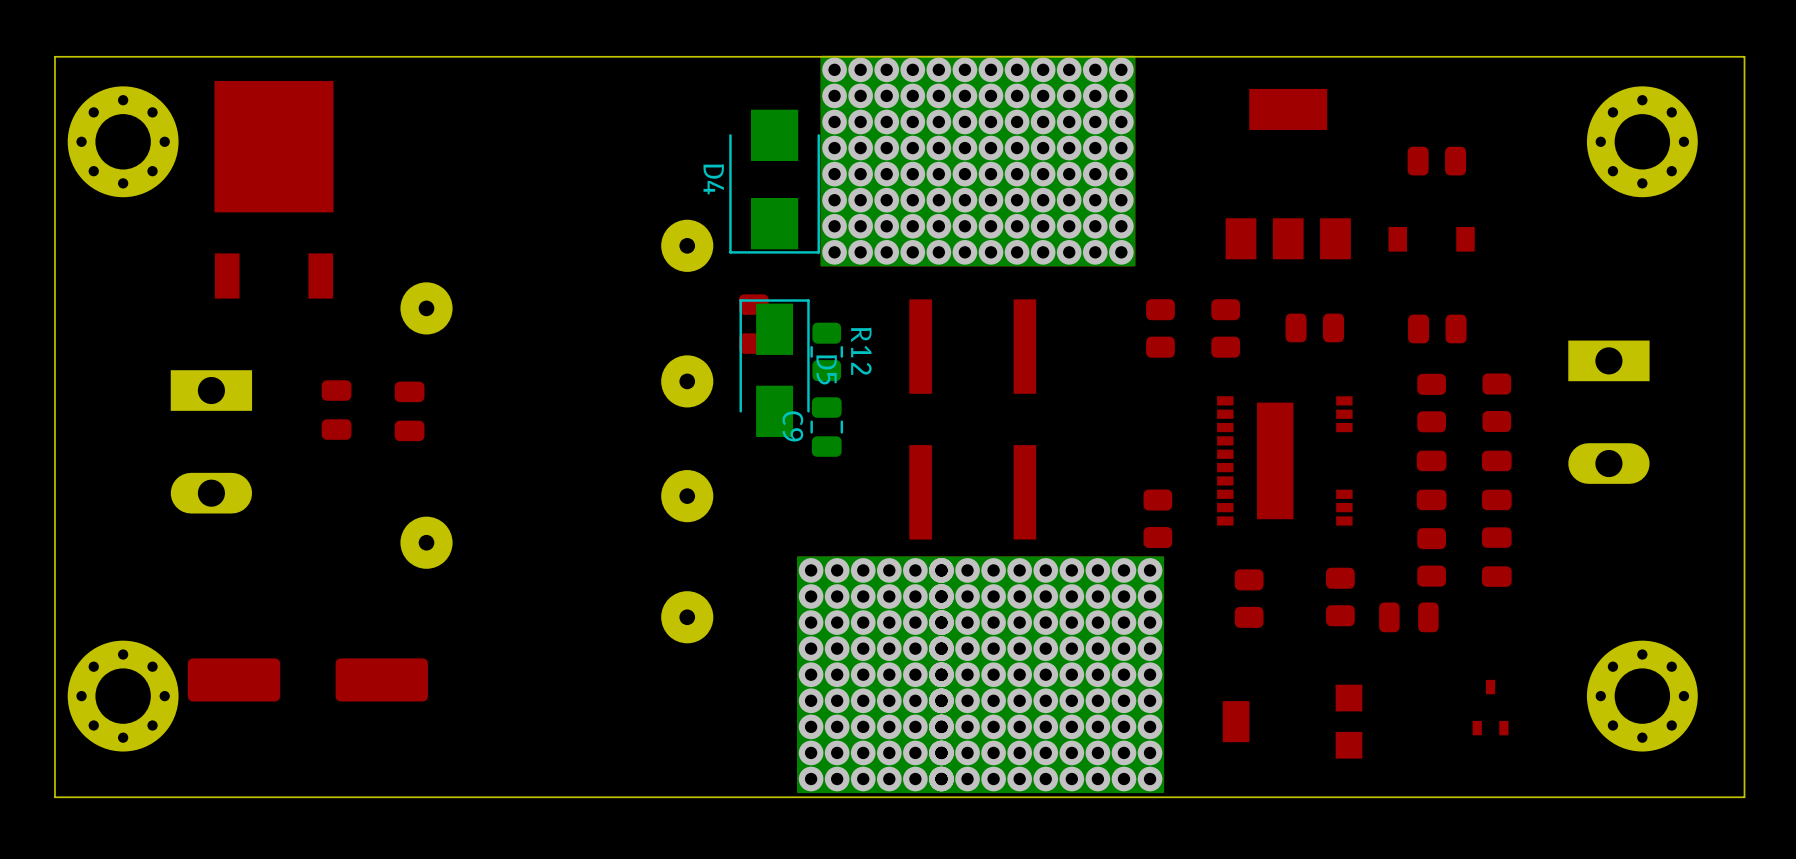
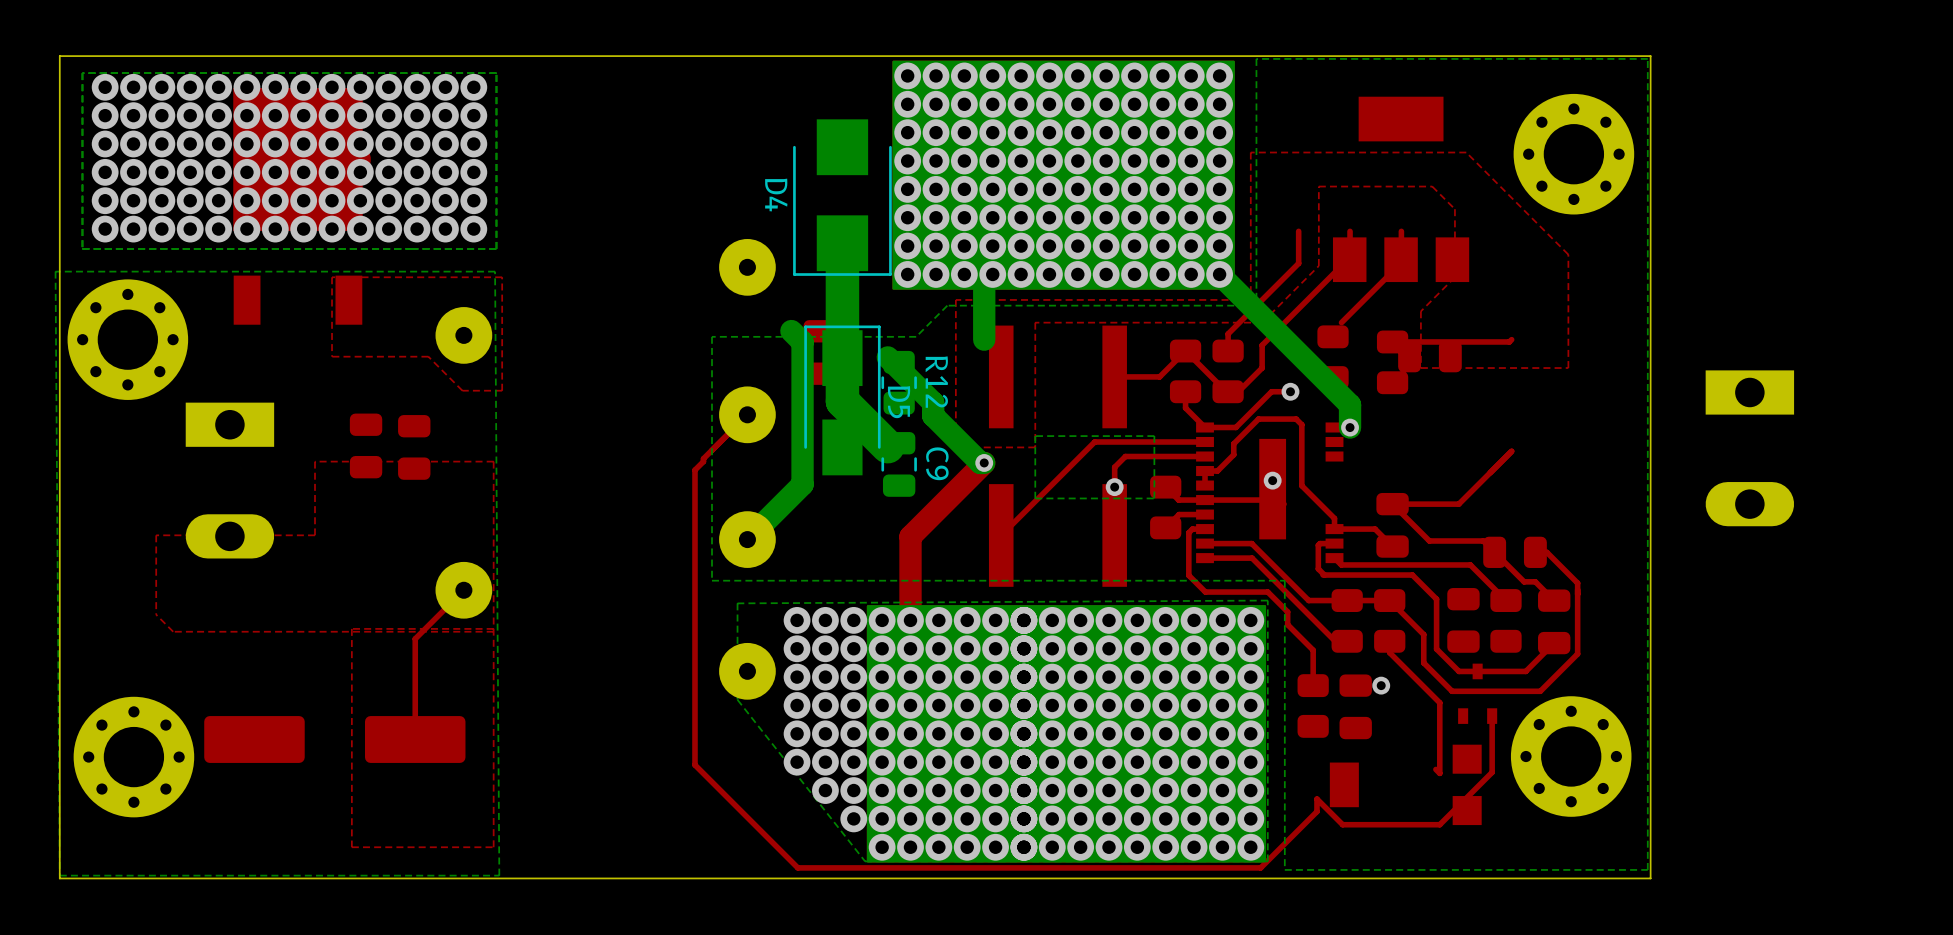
bottom zone outline: none -> (1647, 58) (1647, 869) (1284, 869) (1284, 580) (712, 580) (712, 336) (916, 336) (947, 305) (1256, 305) (1256, 58) (1647, 58)
board edge: (54, 56) (1744, 56) (1744, 797) (54, 797) -> (59, 61) (59, 56) (1650, 56) (1650, 878) (59, 878) (59, 867)
bottom zone outline: none -> (496, 73) (496, 248) (82, 248) (82, 73) (496, 73)
via: none -> (105, 87)
via: none -> (133, 87)
via: none -> (161, 87)
via: none -> (190, 87)
via: none -> (218, 87)
via: none -> (246, 87)
via: none -> (275, 87)
via: none -> (303, 87)
via: none -> (332, 87)
via: none -> (360, 87)
via: none -> (388, 87)
via: none -> (417, 87)
via: none -> (445, 87)
via: none -> (473, 87)
via: none -> (105, 115)
via: none -> (133, 115)
via: none -> (161, 115)
via: none -> (190, 115)
via: none -> (218, 115)
via: none -> (246, 115)
via: none -> (275, 115)
via: none -> (303, 115)
via: none -> (332, 115)
via: none -> (360, 115)
via: none -> (388, 115)
via: none -> (417, 115)
via: none -> (445, 115)
via: none -> (473, 115)
via: none -> (105, 144)
via: none -> (133, 144)
via: none -> (161, 144)
via: none -> (190, 144)
via: none -> (218, 144)
via: none -> (246, 144)
via: none -> (275, 144)
via: none -> (303, 144)
via: none -> (332, 144)
via: none -> (360, 144)
via: none -> (388, 144)
via: none -> (417, 144)
via: none -> (445, 144)
via: none -> (473, 144)
top zone outline: none -> (1466, 152) (1568, 254) (1568, 368) (1420, 368) (1420, 311) (1454, 277) (1454, 209) (1432, 186) (1318, 186) (1318, 265) (1262, 322) (1035, 322) (1035, 447) (955, 447) (955, 299) (1250, 299) (1250, 152) (1466, 152)
part position: (123, 141) -> (127, 339)
part position: (1642, 141) -> (1573, 154)
via: none -> (105, 172)
via: none -> (133, 172)
via: none -> (161, 172)
via: none -> (190, 172)
via: none -> (218, 172)
via: none -> (246, 172)
via: none -> (275, 172)
via: none -> (303, 172)
via: none -> (332, 172)
via: none -> (360, 172)
via: none -> (388, 172)
via: none -> (417, 172)
via: none -> (445, 172)
via: none -> (473, 172)
part: (1436, 161) -> none
via: none -> (105, 200)
via: none -> (133, 200)
via: none -> (161, 200)
via: none -> (190, 200)
via: none -> (218, 200)
via: none -> (246, 200)
via: none -> (275, 200)
via: none -> (303, 200)
via: none -> (332, 200)
via: none -> (360, 200)
via: none -> (388, 200)
via: none -> (417, 200)
via: none -> (445, 200)
via: none -> (473, 200)
via: none -> (105, 229)
via: none -> (133, 229)
via: none -> (161, 229)
via: none -> (190, 229)
via: none -> (218, 229)
via: none -> (246, 229)
via: none -> (275, 229)
via: none -> (303, 229)
via: none -> (332, 229)
via: none -> (360, 229)
via: none -> (388, 229)
via: none -> (417, 229)
via: none -> (445, 229)
via: none -> (473, 229)
top track: none -> (1298, 231) (1298, 263) (1228, 333) (1228, 351)
top track: none -> (1350, 231) (1350, 257) (1262, 345) (1262, 368) (1238, 391) (1226, 391) (1185, 351) (1159, 376) (1114, 376)
top track: none -> (1401, 231) (1401, 262) (1341, 322)
bottom track: none -> (842, 243) (842, 401) (887, 446)
part: (1431, 239) -> none
bottom zone outline: none -> (495, 271) (499, 875) (59, 875) (55, 271) (495, 271)
bottom track: none -> (992, 274) (984, 282) (984, 339)
bottom track: none -> (1219, 274) (1350, 404) (1350, 427)
top zone outline: none -> (502, 277) (502, 390) (462, 390) (428, 356) (332, 356) (332, 277) (502, 277)
bottom track: none -> (791, 331) (802, 342) (802, 484) (747, 539)
top track: none -> (1511, 339) (1509, 341) (1392, 341)
bottom track: none -> (887, 357) (933, 402) (933, 415) (980, 462) (984, 462)
part position: (1160, 328) -> (1228, 371)
part: (1437, 328) -> none
part: none -> (1392, 362)
part: none -> (1185, 371)
top track: none -> (1290, 391) (1271, 391) (1235, 427) (1205, 427) (1185, 408) (1185, 391)
via: none -> (1290, 391)
top track: none -> (747, 414) (703, 458) (703, 461) (694, 470) (694, 765) (797, 867) (1260, 867) (1316, 811) (1316, 799) (1342, 824) (1439, 824) (1492, 772) (1492, 716)
via: none -> (1350, 427)
bottom zone outline: none -> (1154, 436) (1154, 498) (1035, 498) (1035, 436) (1154, 436)
part: (1496, 402) -> none
part: (1431, 403) -> none
top track: none -> (1205, 441) (1094, 441) (1001, 535)
part position: (409, 411) -> (414, 447)
top track: none -> (1511, 451) (1458, 504) (1392, 504) (1429, 541) (1483, 541) (1524, 581) (1535, 581) (1554, 600)
top track: none -> (1205, 456) (1125, 456) (1114, 467) (1114, 535)
top track: none -> (984, 462) (910, 536) (910, 620)
via: none -> (984, 462)
C9 name position: C9 (792, 426) -> C9 (937, 463)
via: none -> (1272, 480)
top track: none -> (1205, 485) (1205, 471) (1217, 471) (1233, 454) (1233, 443) (1258, 419) (1296, 419) (1301, 424) (1301, 485) (1334, 518) (1334, 529) (1375, 529) (1392, 546)
via: none -> (1114, 487)
top track: none -> (1165, 487) (1178, 500) (1265, 500) (1272, 492)
part: none -> (1269, 492)
part: (1284, 460) -> none
part: none -> (1165, 507)
top track: none -> (1205, 514) (1179, 514) (1165, 527)
part: (1431, 480) -> none
part: (1496, 480) -> none
part: none -> (1392, 525)
top track: none -> (1205, 529) (1192, 529) (1188, 532) (1188, 575) (1205, 592) (1267, 592) (1287, 611) (1287, 624) (1313, 650) (1313, 685)
top track: none -> (1205, 543) (1251, 543) (1308, 600) (1389, 600) (1423, 634) (1423, 662) (1452, 691) (1540, 691) (1577, 653) (1577, 583) (1546, 552) (1535, 552)
top track: none -> (1334, 543) (1318, 545) (1318, 568) (1324, 575)
part: none -> (1515, 552)
top track: none -> (1205, 558) (1252, 558) (1335, 641) (1347, 641) (1347, 634)
top track: none -> (1334, 558) (1341, 564) (1470, 564) (1506, 600)
part: (1157, 518) -> none
top track: none -> (1323, 575) (1412, 575) (1436, 599) (1436, 649) (1458, 671) (1525, 671) (1554, 643)
part footprint: [1417, 528, 1447, 587] -> [1538, 589, 1571, 655]
top track: none -> (463, 590) (415, 638) (415, 759)
bottom zone outline: none -> (1267, 600) (1267, 861) (865, 861) (737, 699) (737, 603) (1267, 600)
part: (1496, 557) -> none
via: none -> (797, 620)
via: none -> (825, 620)
via: none -> (853, 620)
part: none -> (1347, 620)
part: none -> (1389, 620)
part: none -> (1463, 620)
part: none -> (1506, 620)
top zone outline: none -> (493, 628) (351, 628) (351, 847) (493, 847) (493, 461) (315, 461) (315, 535) (156, 535) (156, 614) (173, 631) (493, 631)
top track: none -> (1389, 641) (1389, 652) (1439, 702) (1439, 773) (1435, 769)
via: none -> (797, 648)
via: none -> (825, 648)
via: none -> (853, 648)
part: (1340, 596) -> none
part: (1249, 598) -> none
part: (1408, 617) -> none
via: none -> (797, 677)
via: none -> (825, 677)
via: none -> (853, 677)
via: none -> (1381, 685)
via: none -> (797, 705)
via: none -> (825, 705)
via: none -> (853, 705)
part: none -> (1313, 705)
part: none -> (1355, 706)
via: none -> (797, 733)
via: none -> (825, 733)
via: none -> (853, 733)
part position: (1642, 696) -> (1571, 756)
via: none -> (797, 762)
via: none -> (825, 762)
via: none -> (853, 762)
part position: (1490, 707) -> (1477, 693)
via: none -> (825, 790)
via: none -> (853, 790)
via: none -> (853, 818)

